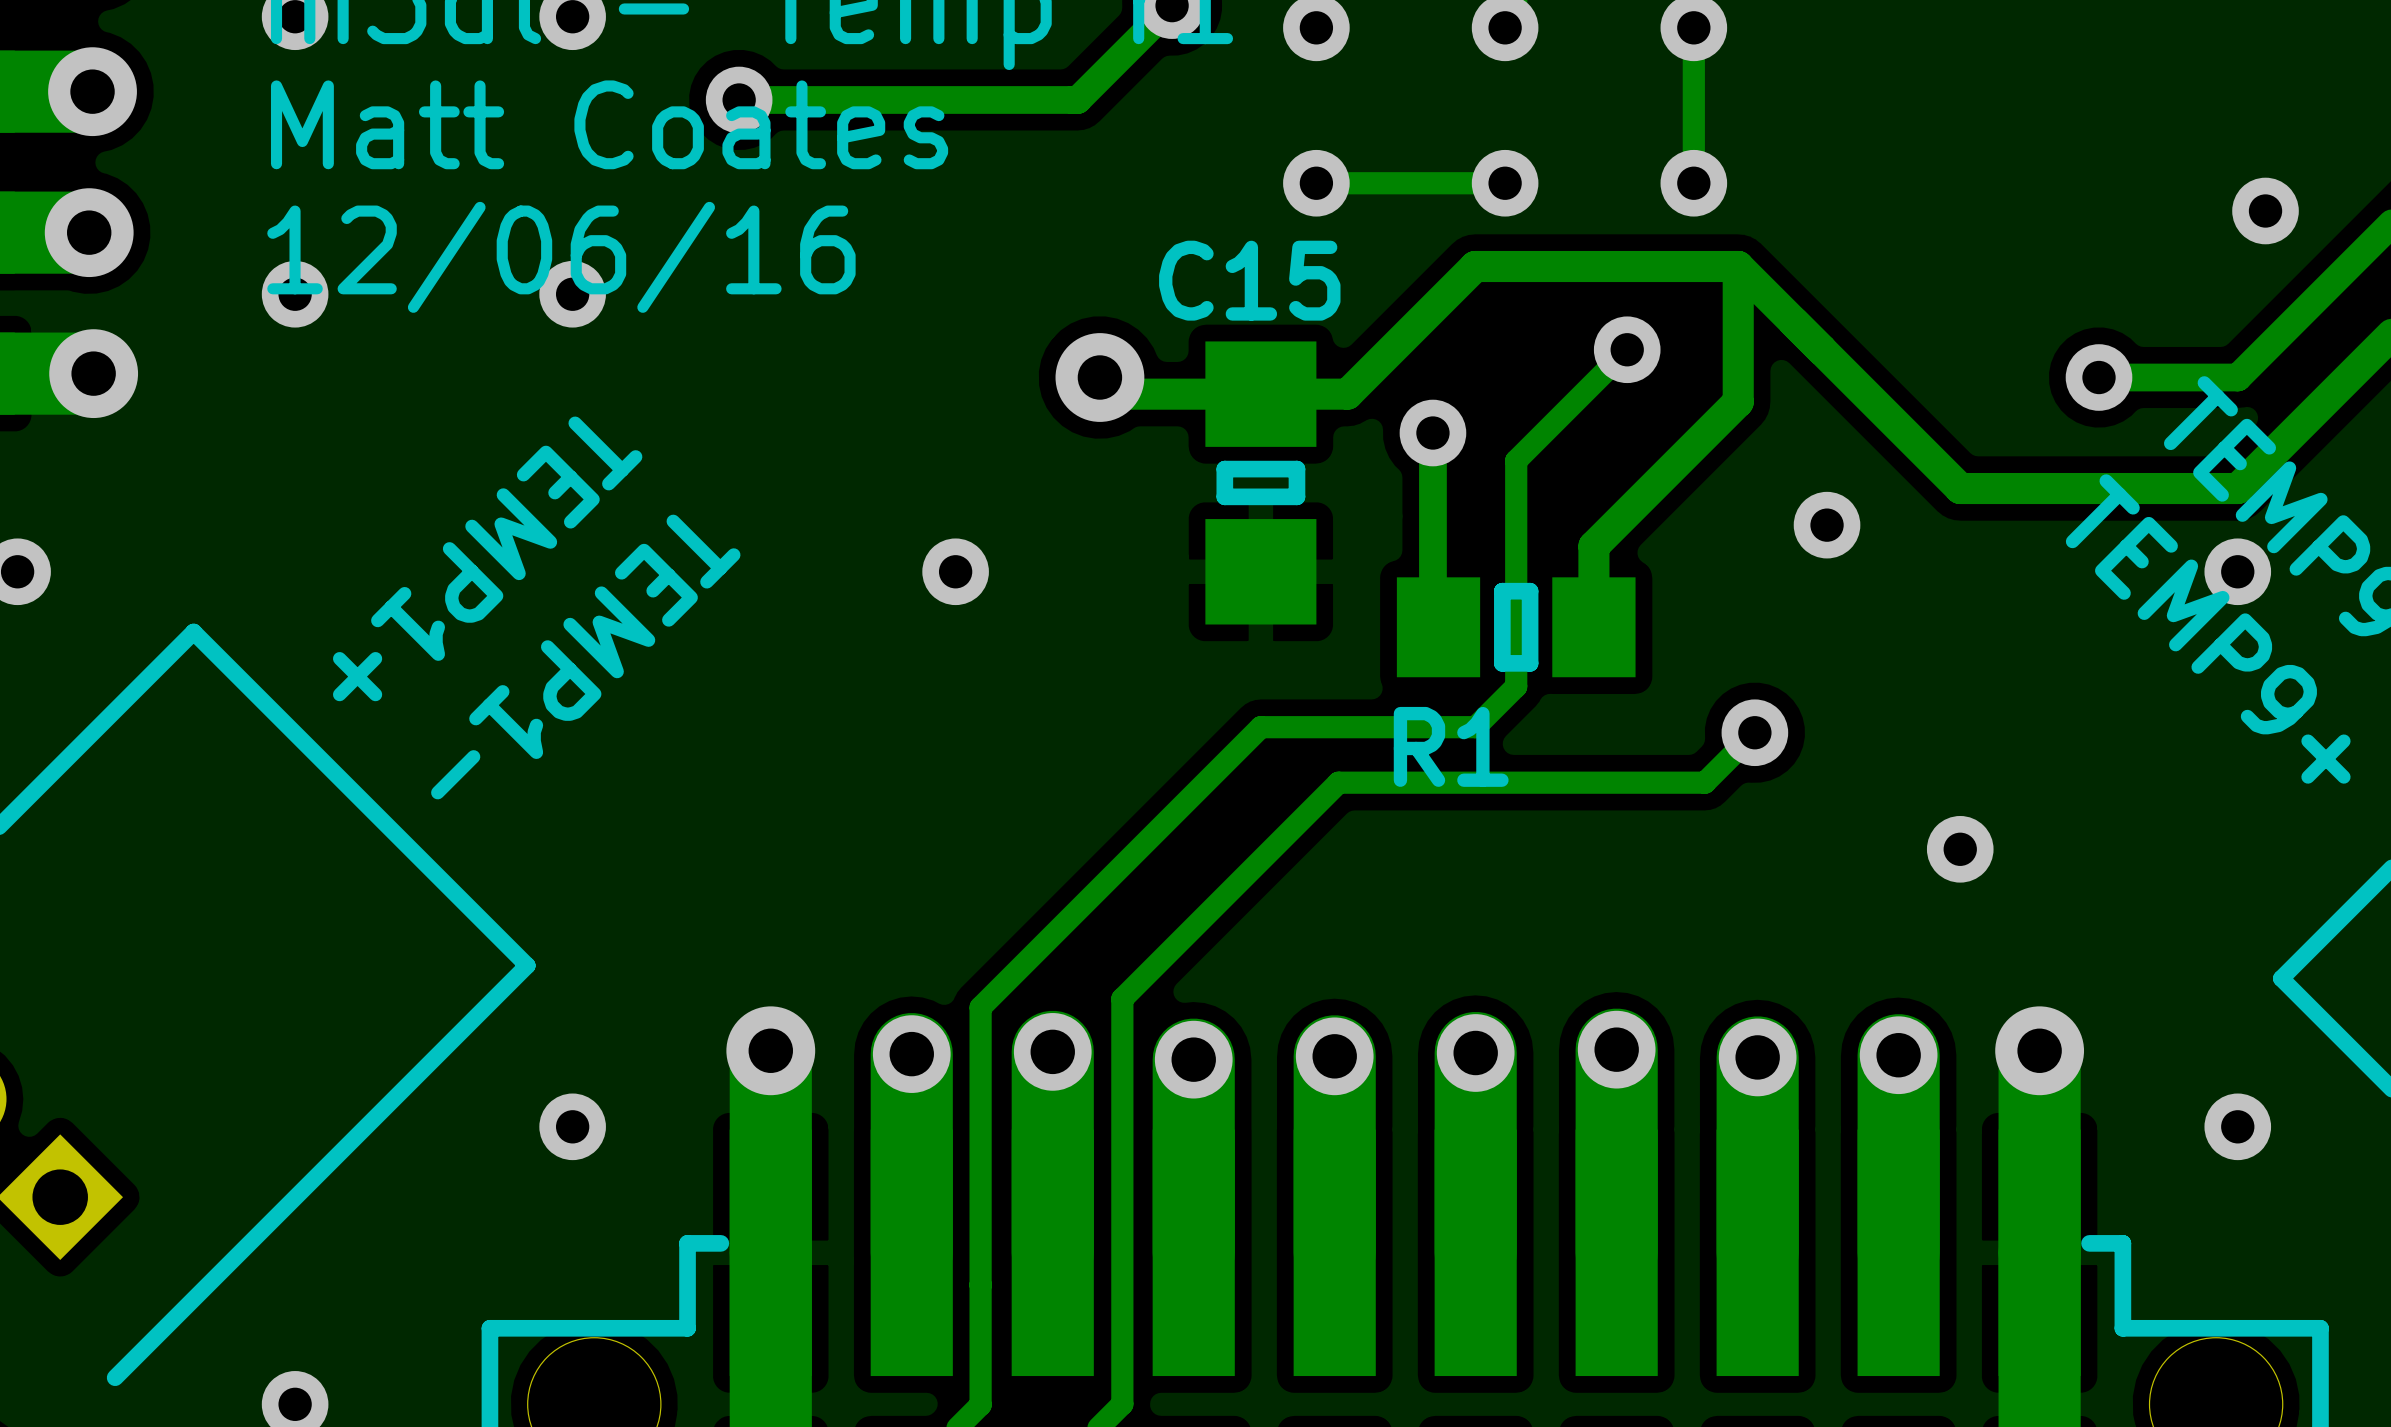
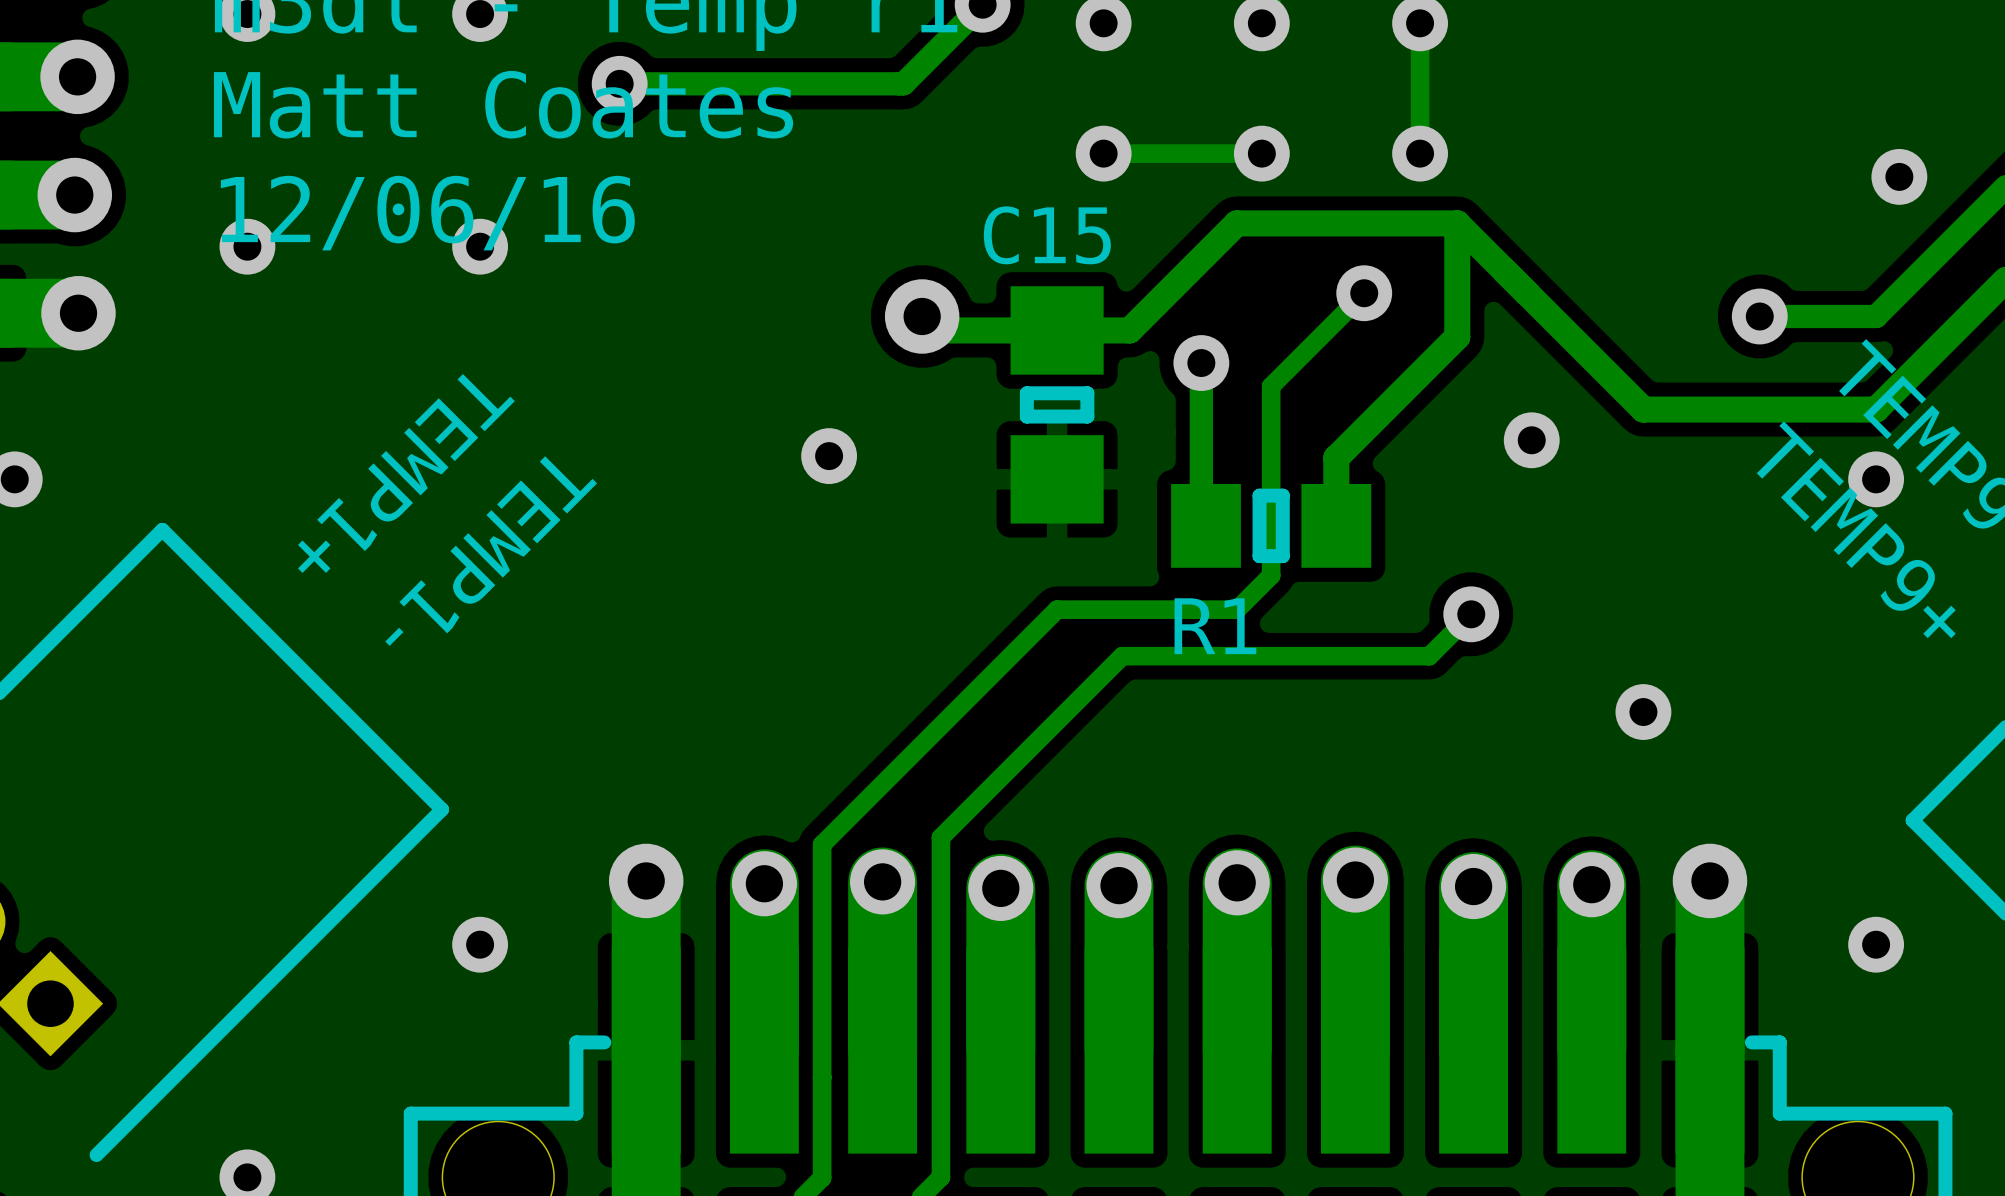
via position: (955, 571) -> (829, 456)

